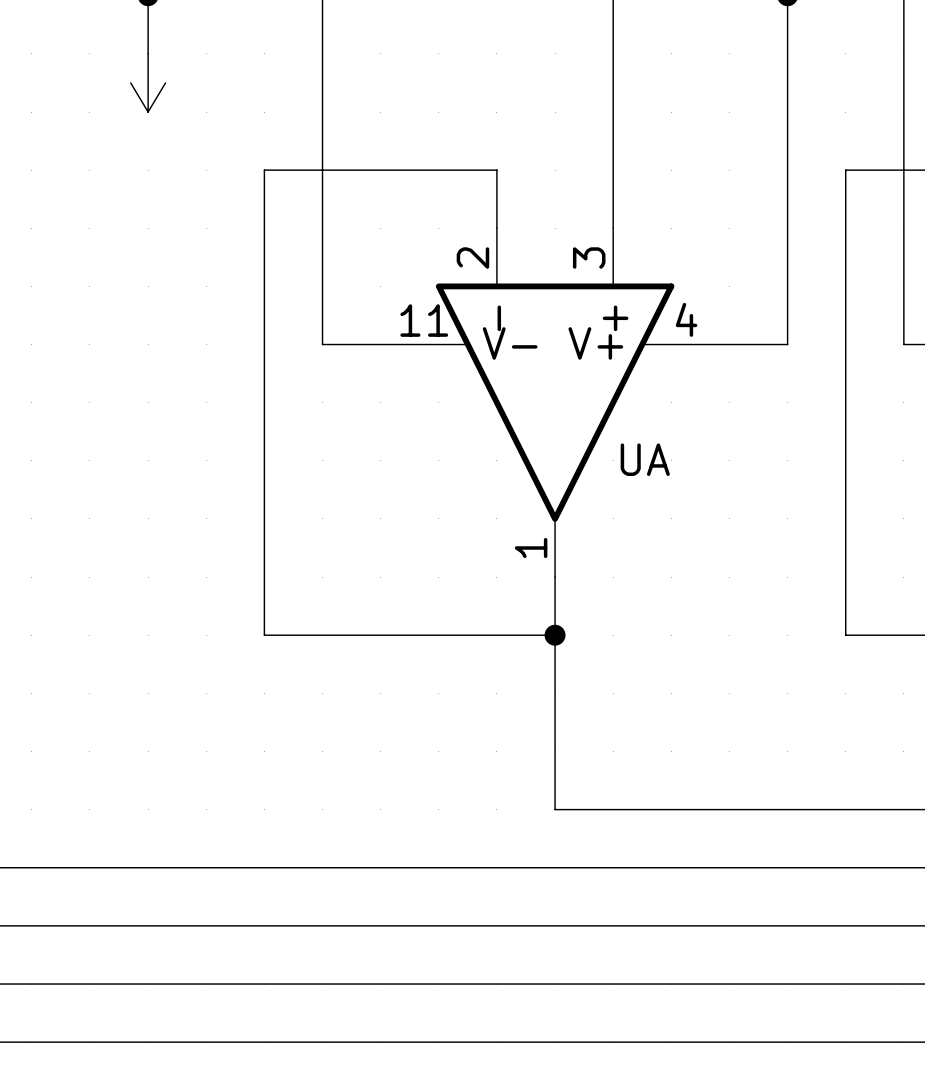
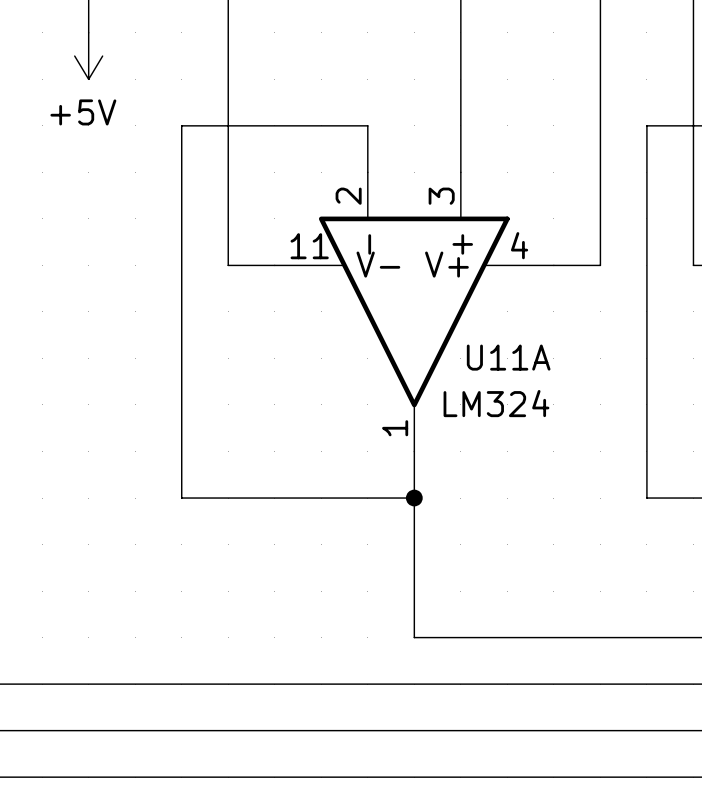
power symbol text: none -> +5V (83, 112)
UA name: UA (645, 459) -> U11A (508, 357)
UA value: none -> LM324 (496, 403)

